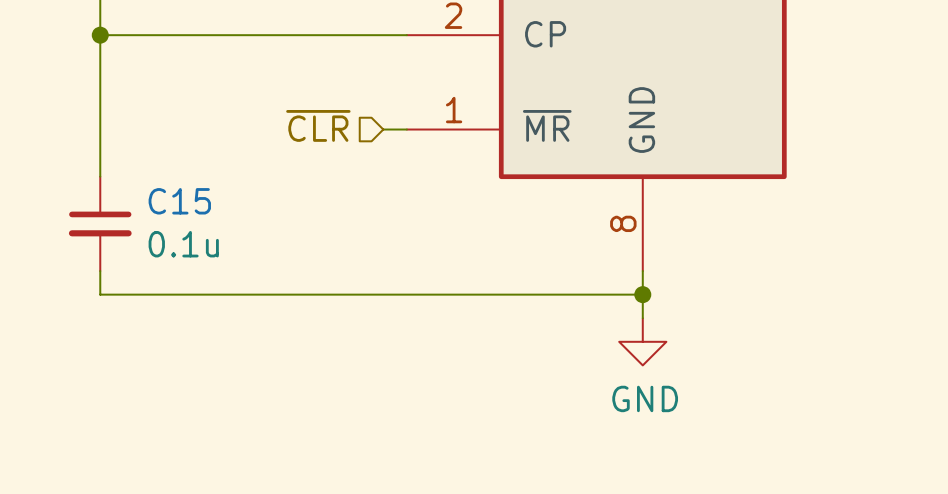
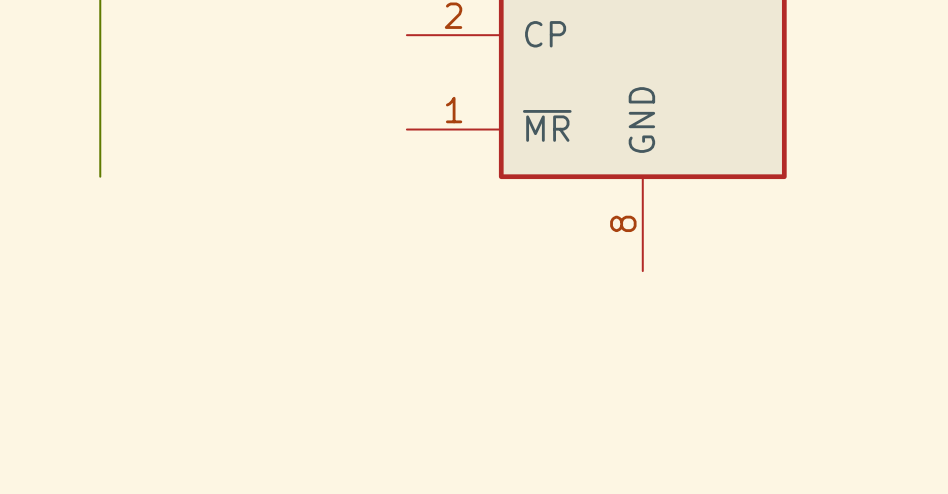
wire: (100, 35) (406, 35) -> none
junction: (100, 35) -> none
hierarchical label: ~{CLR} (318, 125) -> none
wire: (383, 129) (406, 129) -> none
C15: 0.1u (100, 223) -> none
wire: (100, 271) (100, 294) (642, 294) -> none
wire: (642, 271) (642, 318) -> none
junction: (642, 294) -> none
power symbol: GND (642, 341) -> none

